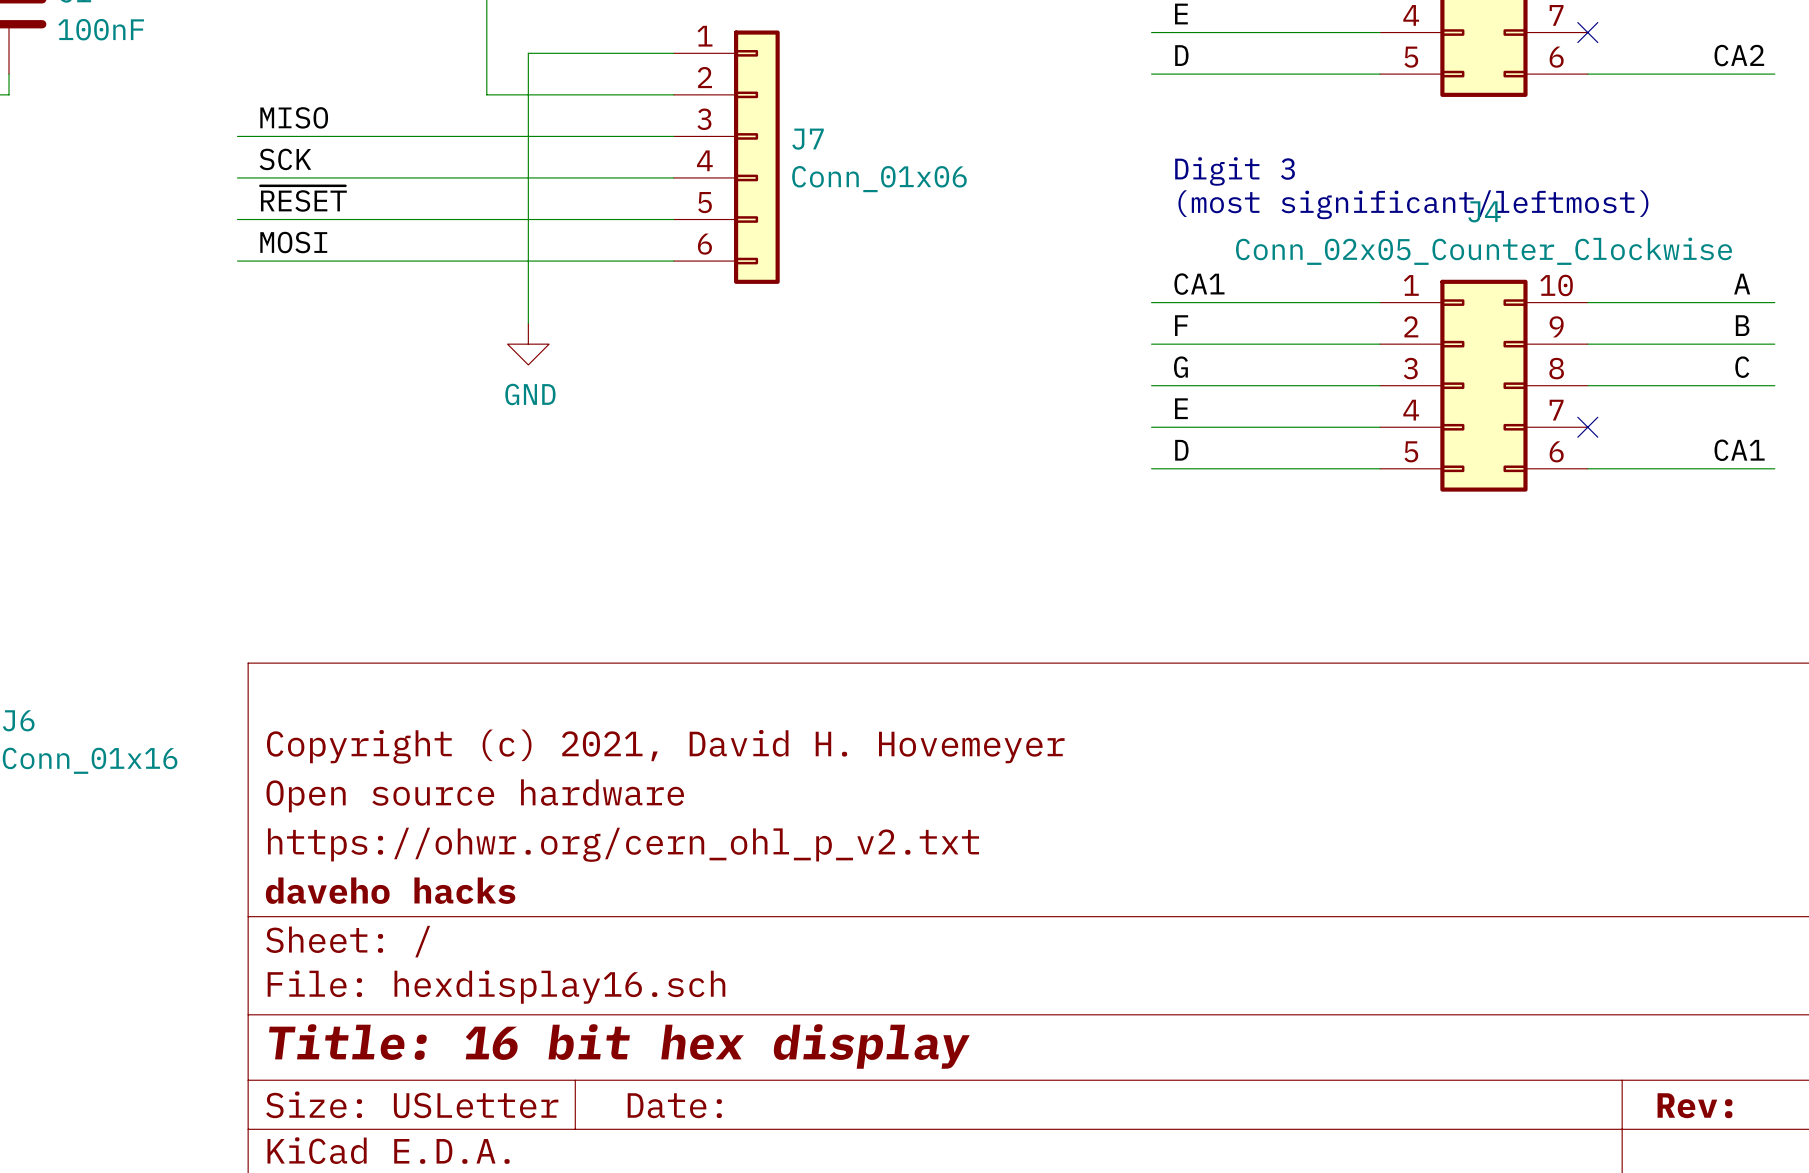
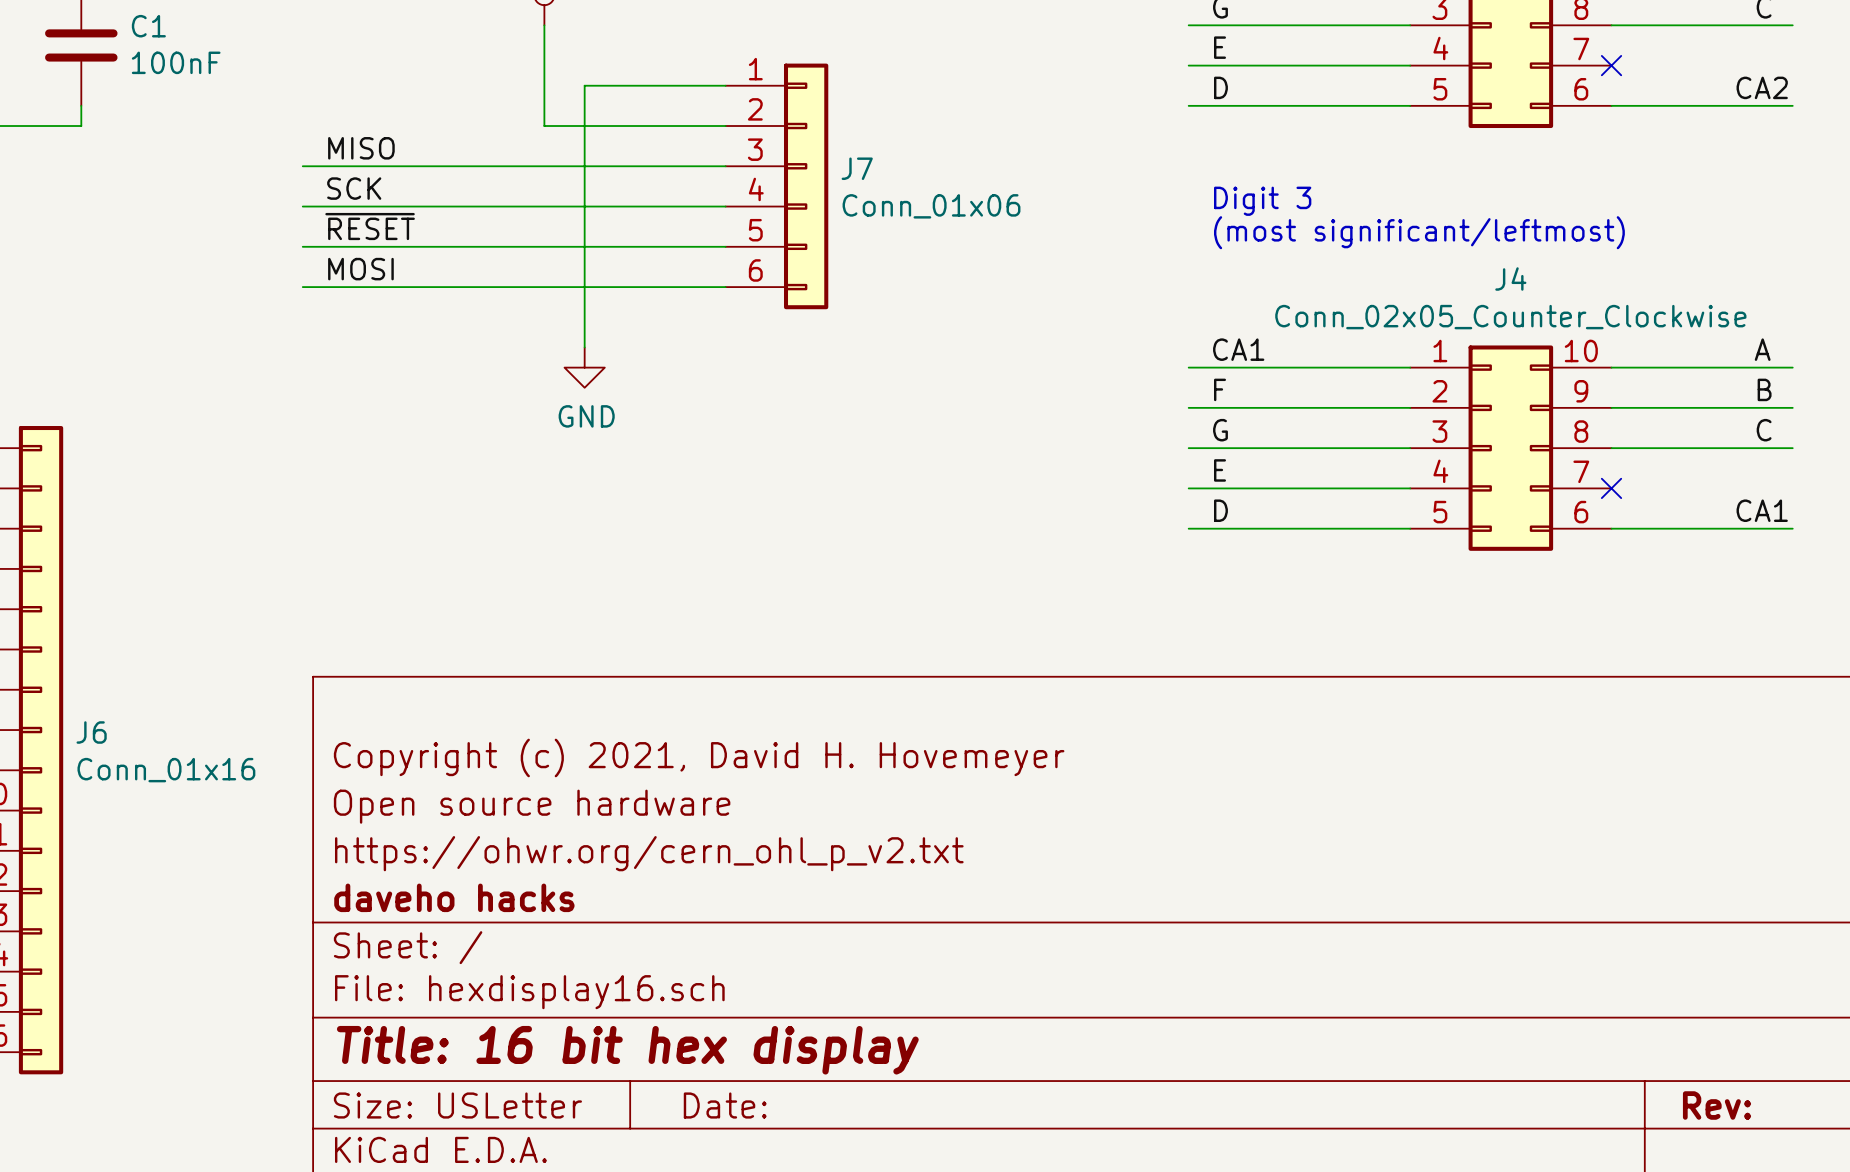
label: CA1 (1199, 284) -> none
label: A (1742, 284) -> none
wire: (1151, 302) (1380, 302) -> (1188, 528) (1410, 528)
wire: (1587, 302) (1774, 302) -> (1611, 528) (1792, 528)
label: F (1181, 325) -> CA1 (1238, 349)
label: B (1742, 325) -> A (1762, 349)
label: G (1180, 367) -> F (1220, 389)
label: C (1742, 367) -> B (1764, 389)
J4 position: (1483, 385) -> (1510, 448)
label: E (1181, 408) -> G (1220, 430)
label: none -> C (1764, 430)
no-connect mark position: (1587, 427) -> (1611, 488)
label: D (1181, 450) -> E (1220, 470)
label position: CA1 (1739, 450) -> CA1 (1762, 510)
wire: (1587, 468) (1774, 468) -> (1611, 448) (1792, 448)
label: none -> D (1220, 510)

